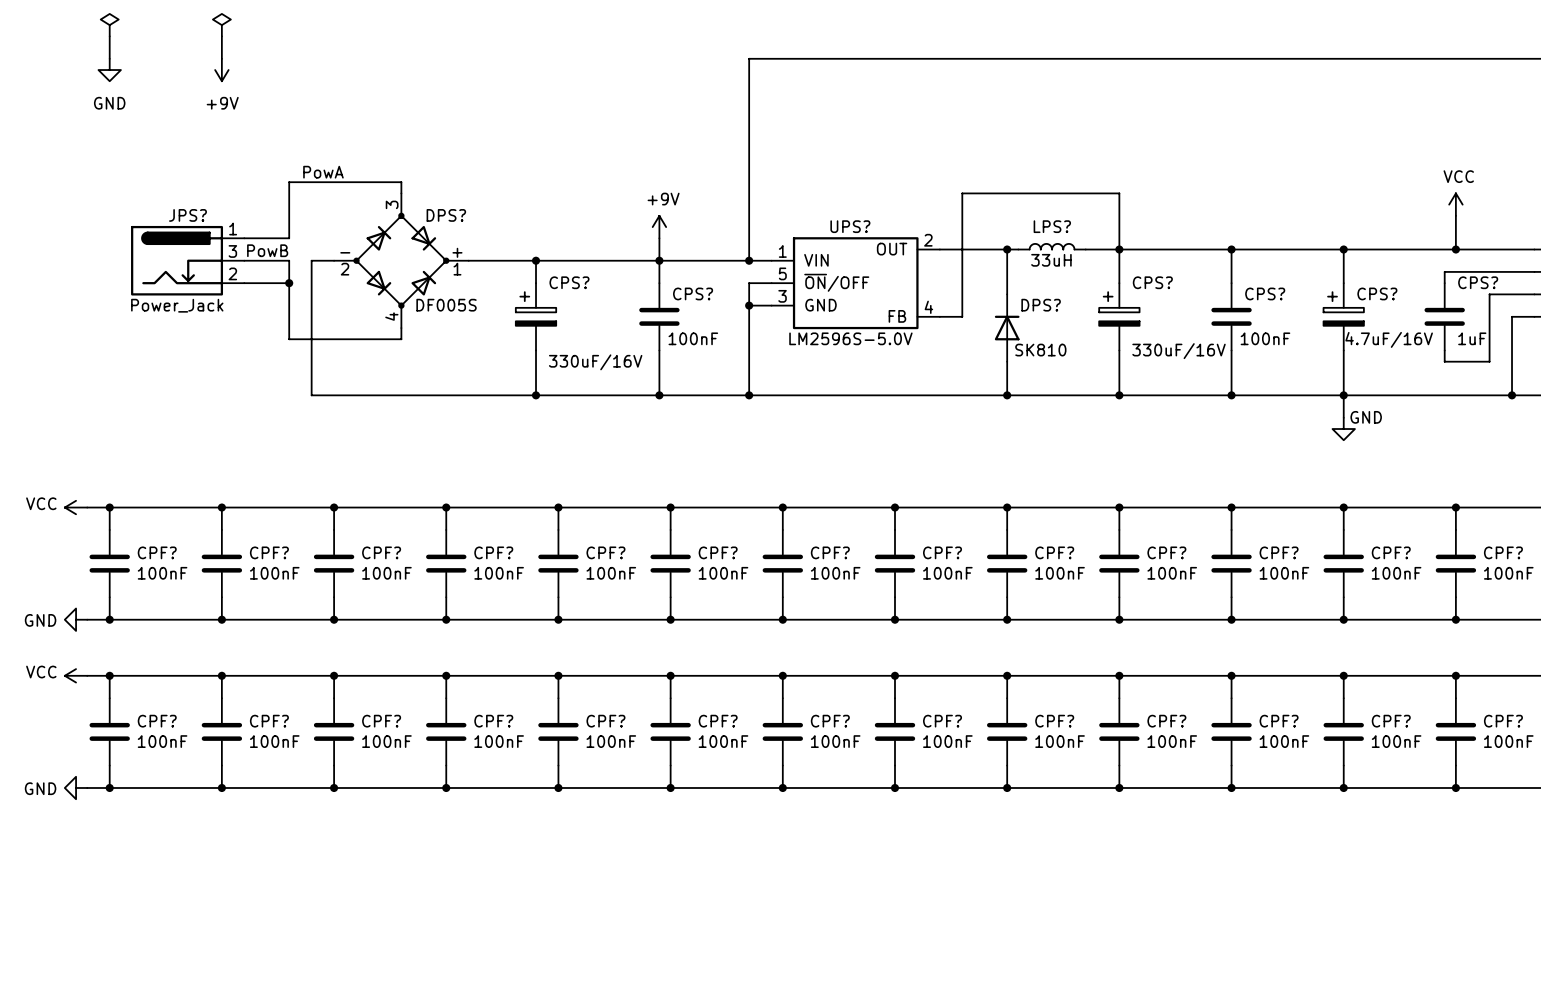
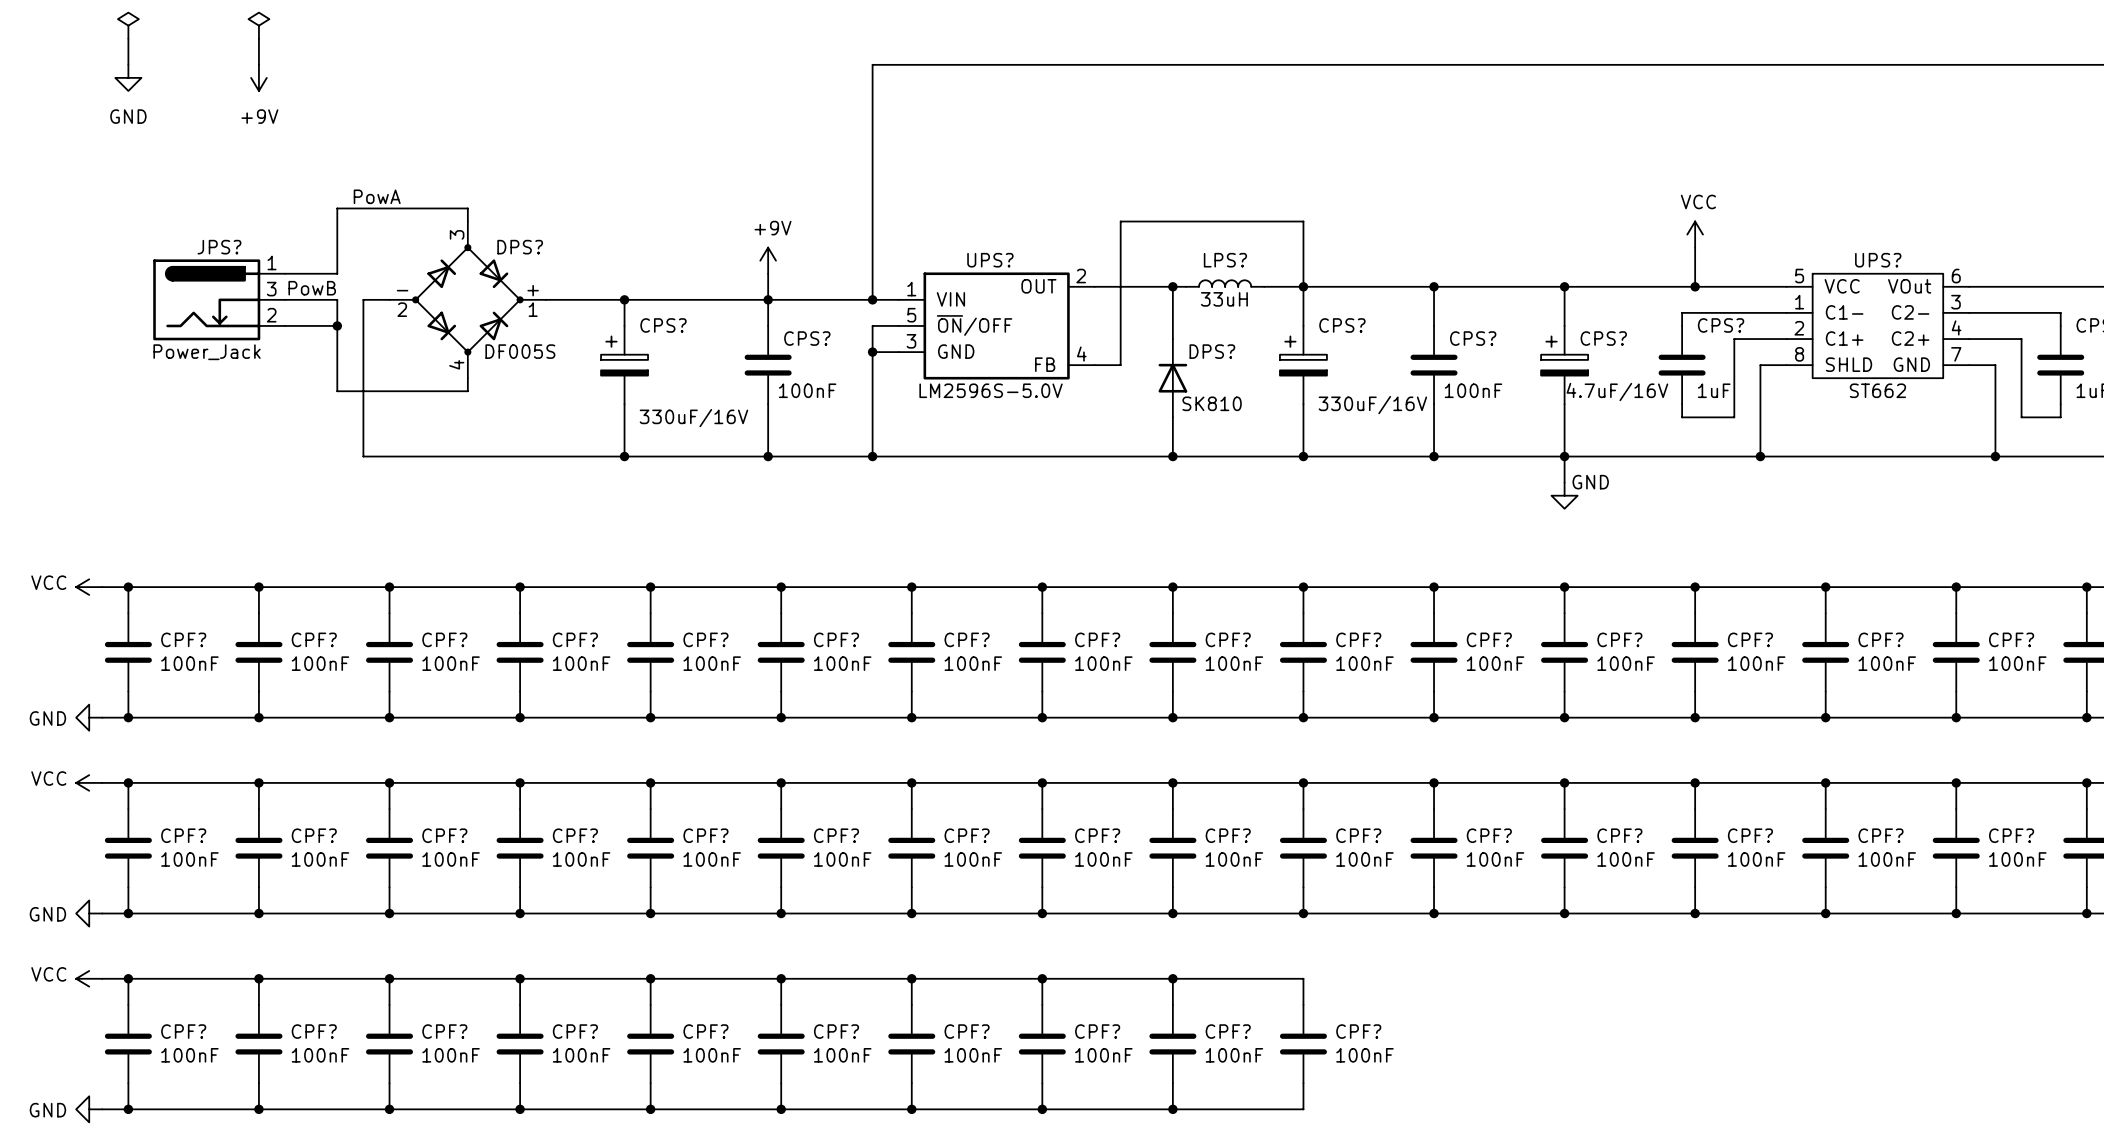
power symbol: none -> VCC (89, 978)
wire: none -> (102, 978) (1303, 978) (1303, 1004)
wire: none -> (128, 978) (128, 1004)
junction: none -> (128, 978)
wire: none -> (258, 978) (258, 1004)
junction: none -> (258, 978)
wire: none -> (389, 978) (389, 1004)
junction: none -> (389, 978)
wire: none -> (520, 978) (520, 1004)
junction: none -> (520, 978)
wire: none -> (650, 978) (650, 1004)
junction: none -> (650, 978)
wire: none -> (781, 978) (781, 1004)
junction: none -> (781, 978)
wire: none -> (911, 978) (911, 1004)
junction: none -> (911, 978)
wire: none -> (1042, 978) (1042, 1004)
junction: none -> (1042, 978)
wire: none -> (1172, 978) (1172, 1004)
junction: none -> (1172, 978)
CPF?: none -> 100nF (128, 1044)
CPF?: none -> 100nF (258, 1044)
CPF?: none -> 100nF (389, 1044)
CPF?: none -> 100nF (520, 1044)
CPF?: none -> 100nF (650, 1044)
CPF?: none -> 100nF (781, 1044)
CPF?: none -> 100nF (911, 1044)
CPF?: none -> 100nF (1042, 1044)
CPF?: none -> 100nF (1172, 1044)
CPF?: none -> 100nF (1303, 1044)
wire: none -> (128, 1083) (128, 1109)
wire: none -> (258, 1083) (258, 1109)
wire: none -> (389, 1083) (389, 1109)
wire: none -> (520, 1083) (520, 1109)
wire: none -> (650, 1083) (650, 1109)
wire: none -> (781, 1083) (781, 1109)
wire: none -> (911, 1083) (911, 1109)
wire: none -> (1042, 1083) (1042, 1109)
wire: none -> (1172, 1083) (1172, 1109)
wire: none -> (1303, 1083) (1303, 1109) (102, 1109)
power symbol: none -> GND (89, 1109)
junction: none -> (128, 1109)
junction: none -> (258, 1109)
junction: none -> (389, 1109)
junction: none -> (520, 1109)
junction: none -> (650, 1109)
junction: none -> (781, 1109)
junction: none -> (911, 1109)
junction: none -> (1042, 1109)
junction: none -> (1172, 1109)

